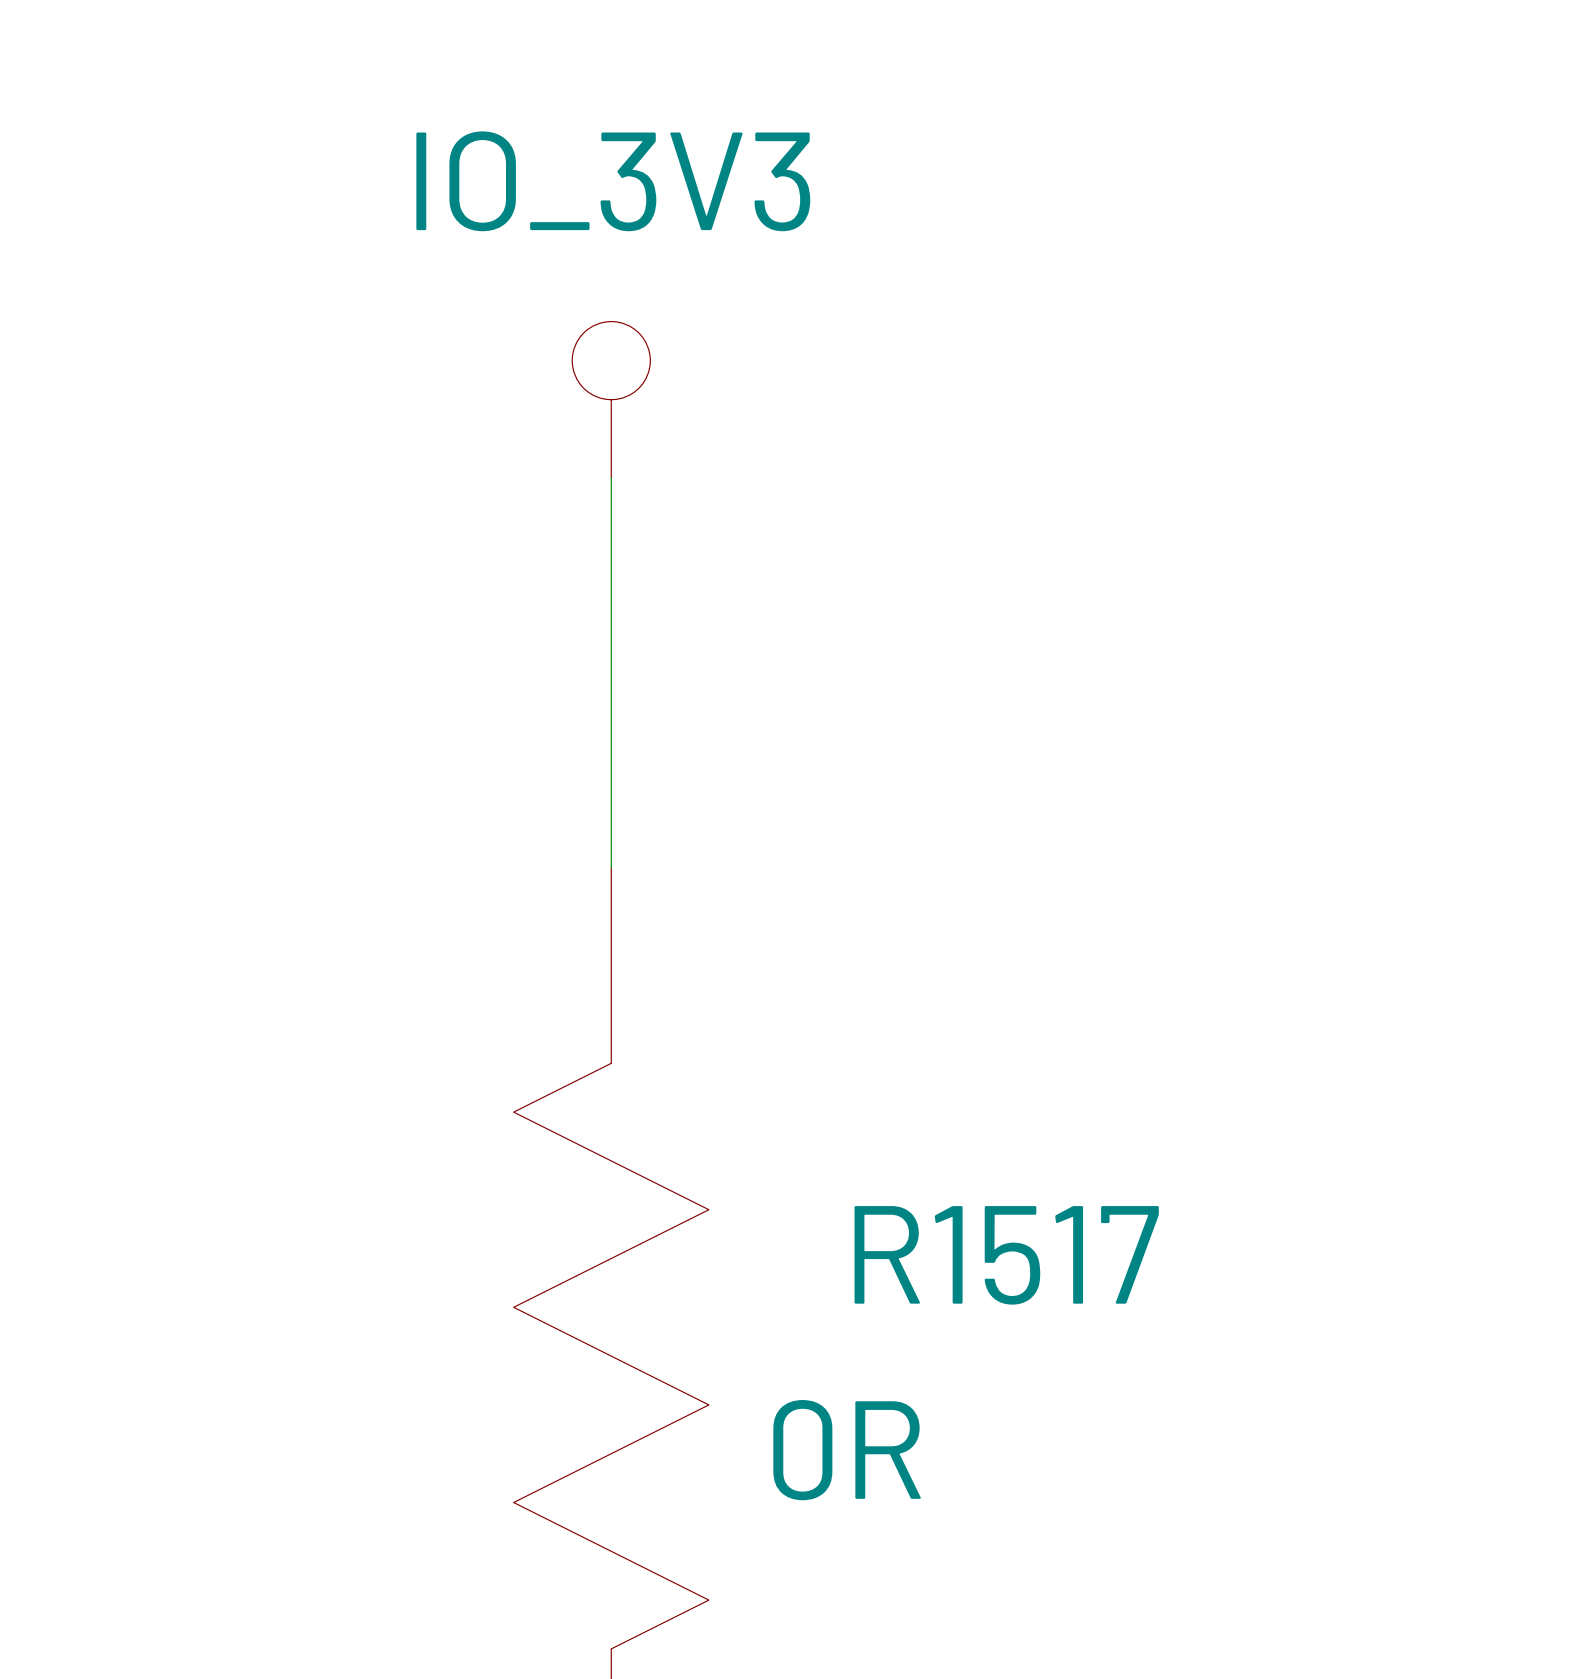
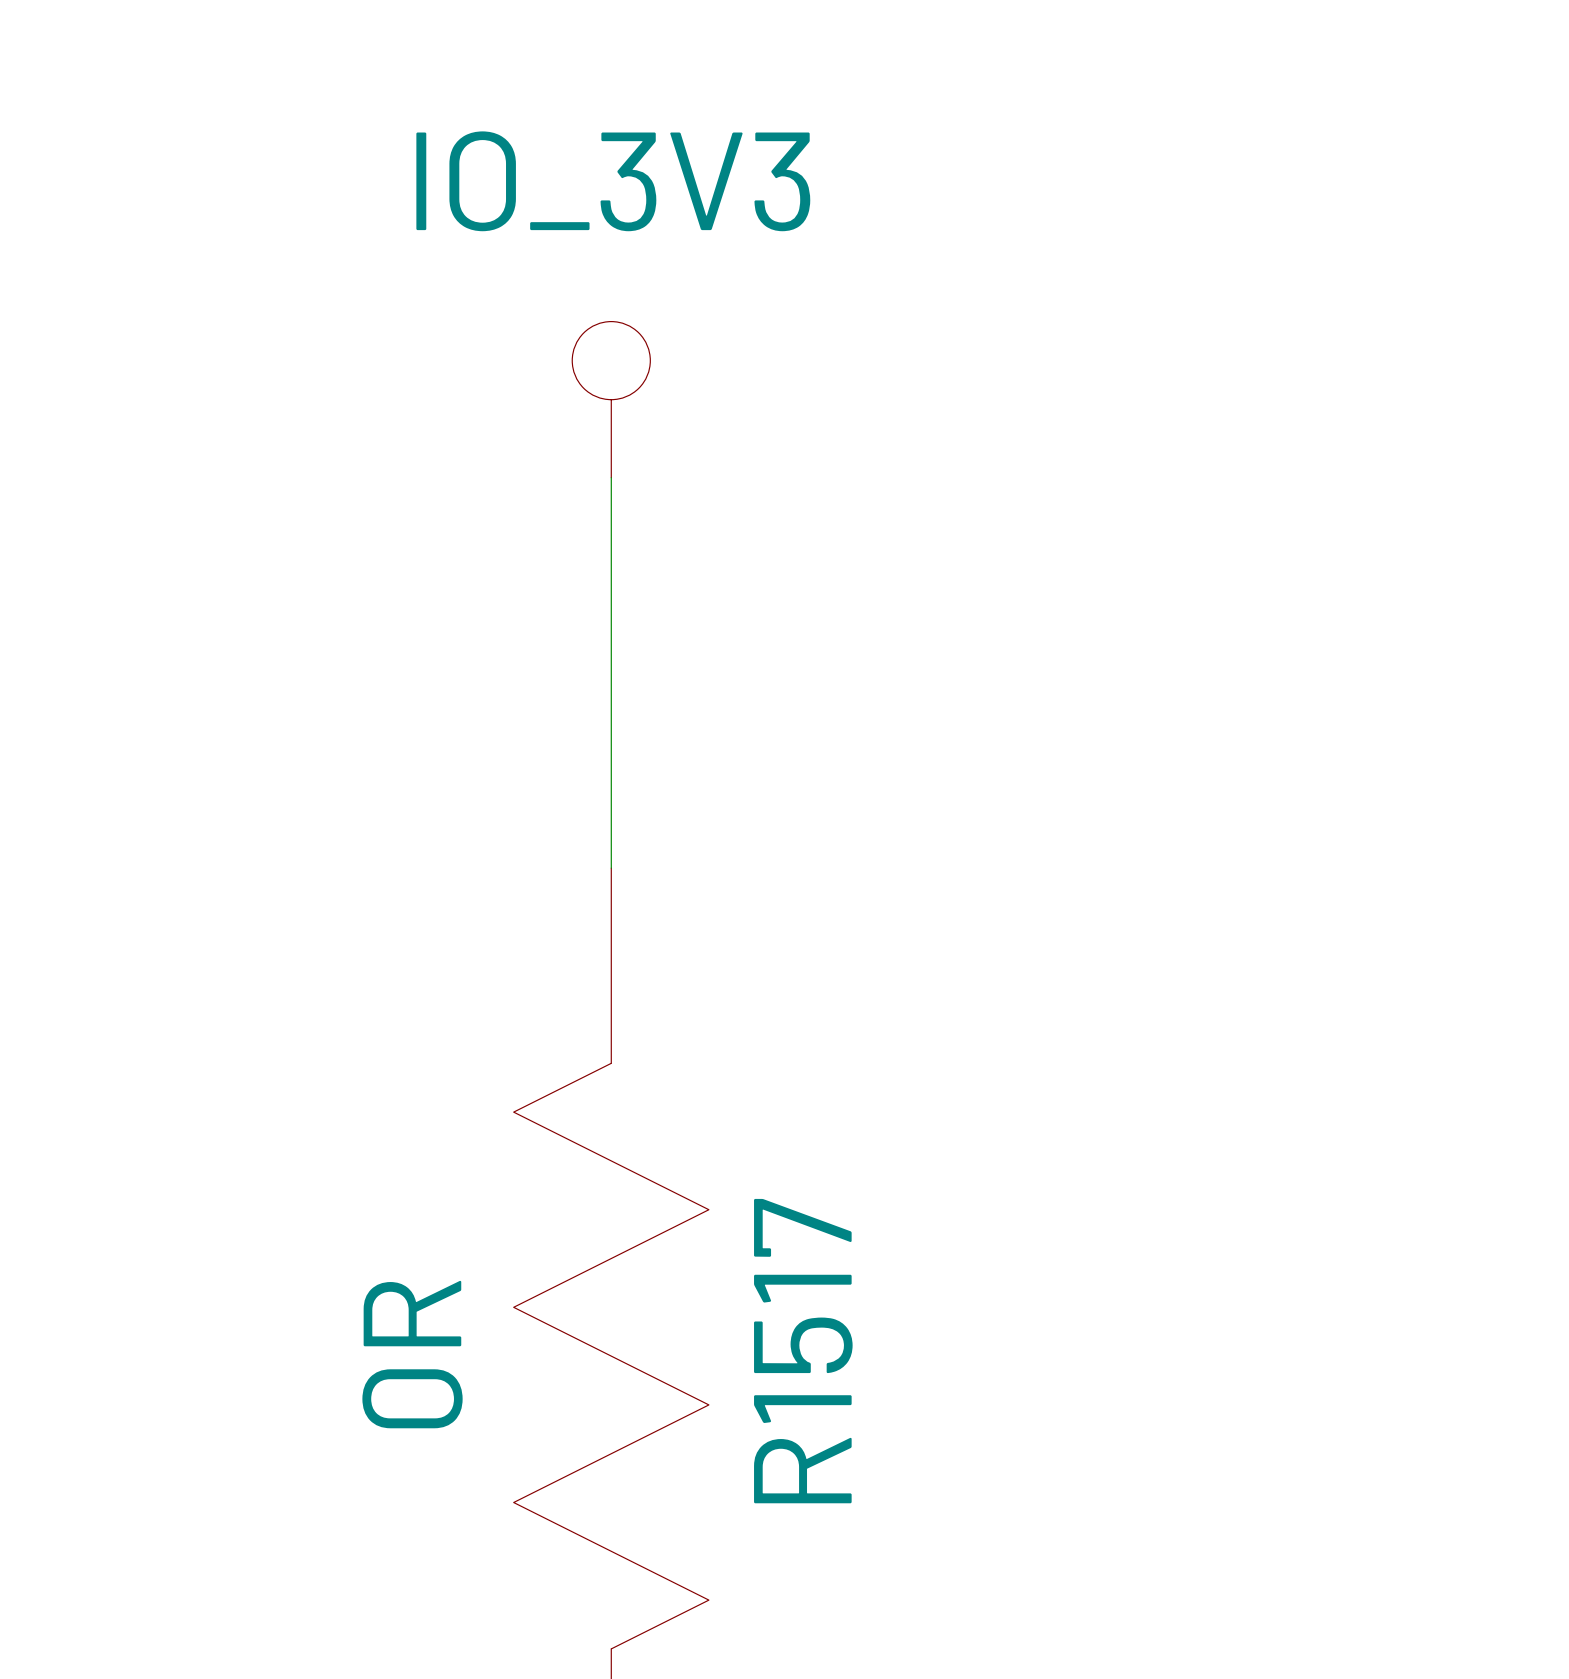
R1517 name rotation: 0° (1006, 1255) -> 90° counterclockwise (803, 1351)
R1517 value rotation: 0° (847, 1450) -> 90° counterclockwise (412, 1354)
R1517 value position: 0R (847, 1450) -> 0R (412, 1354)

